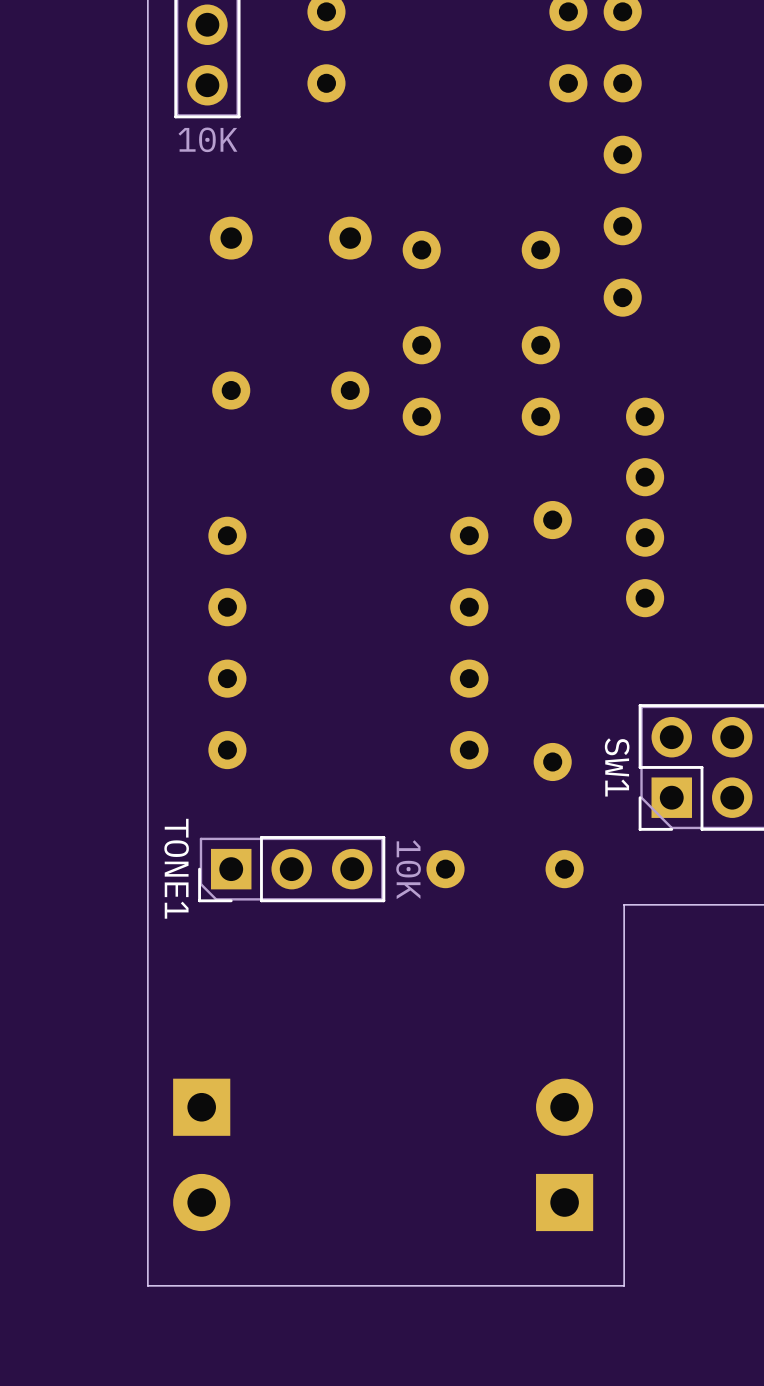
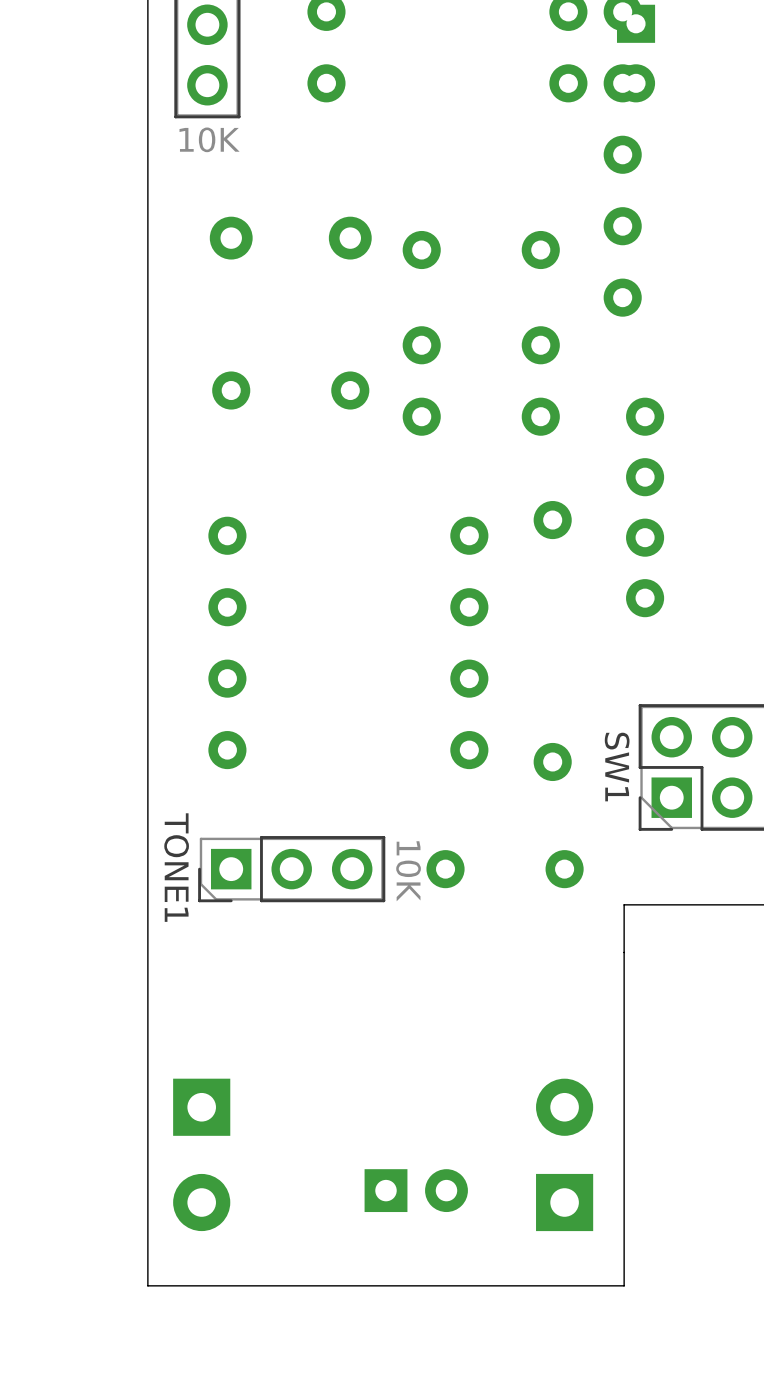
part: none -> (636, 53)
part: none -> (416, 1190)

